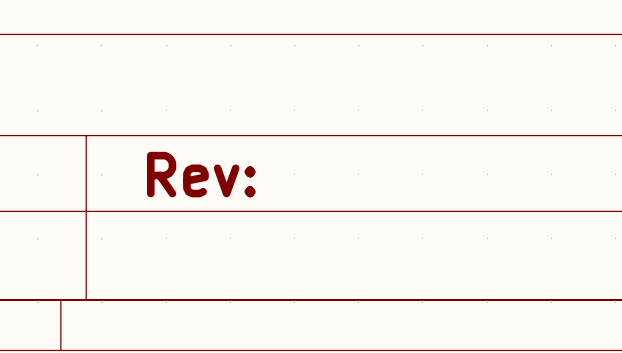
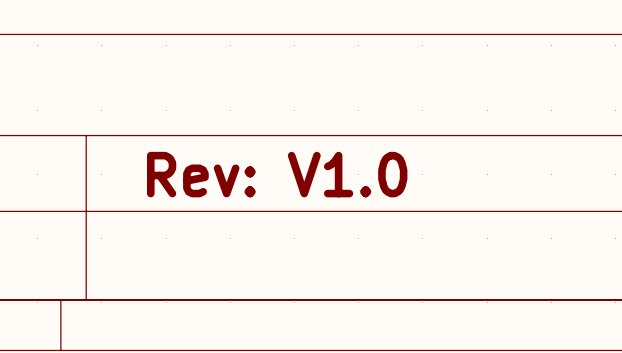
title block: Rev: (201, 174) -> Rev: V1.0 (277, 174)

